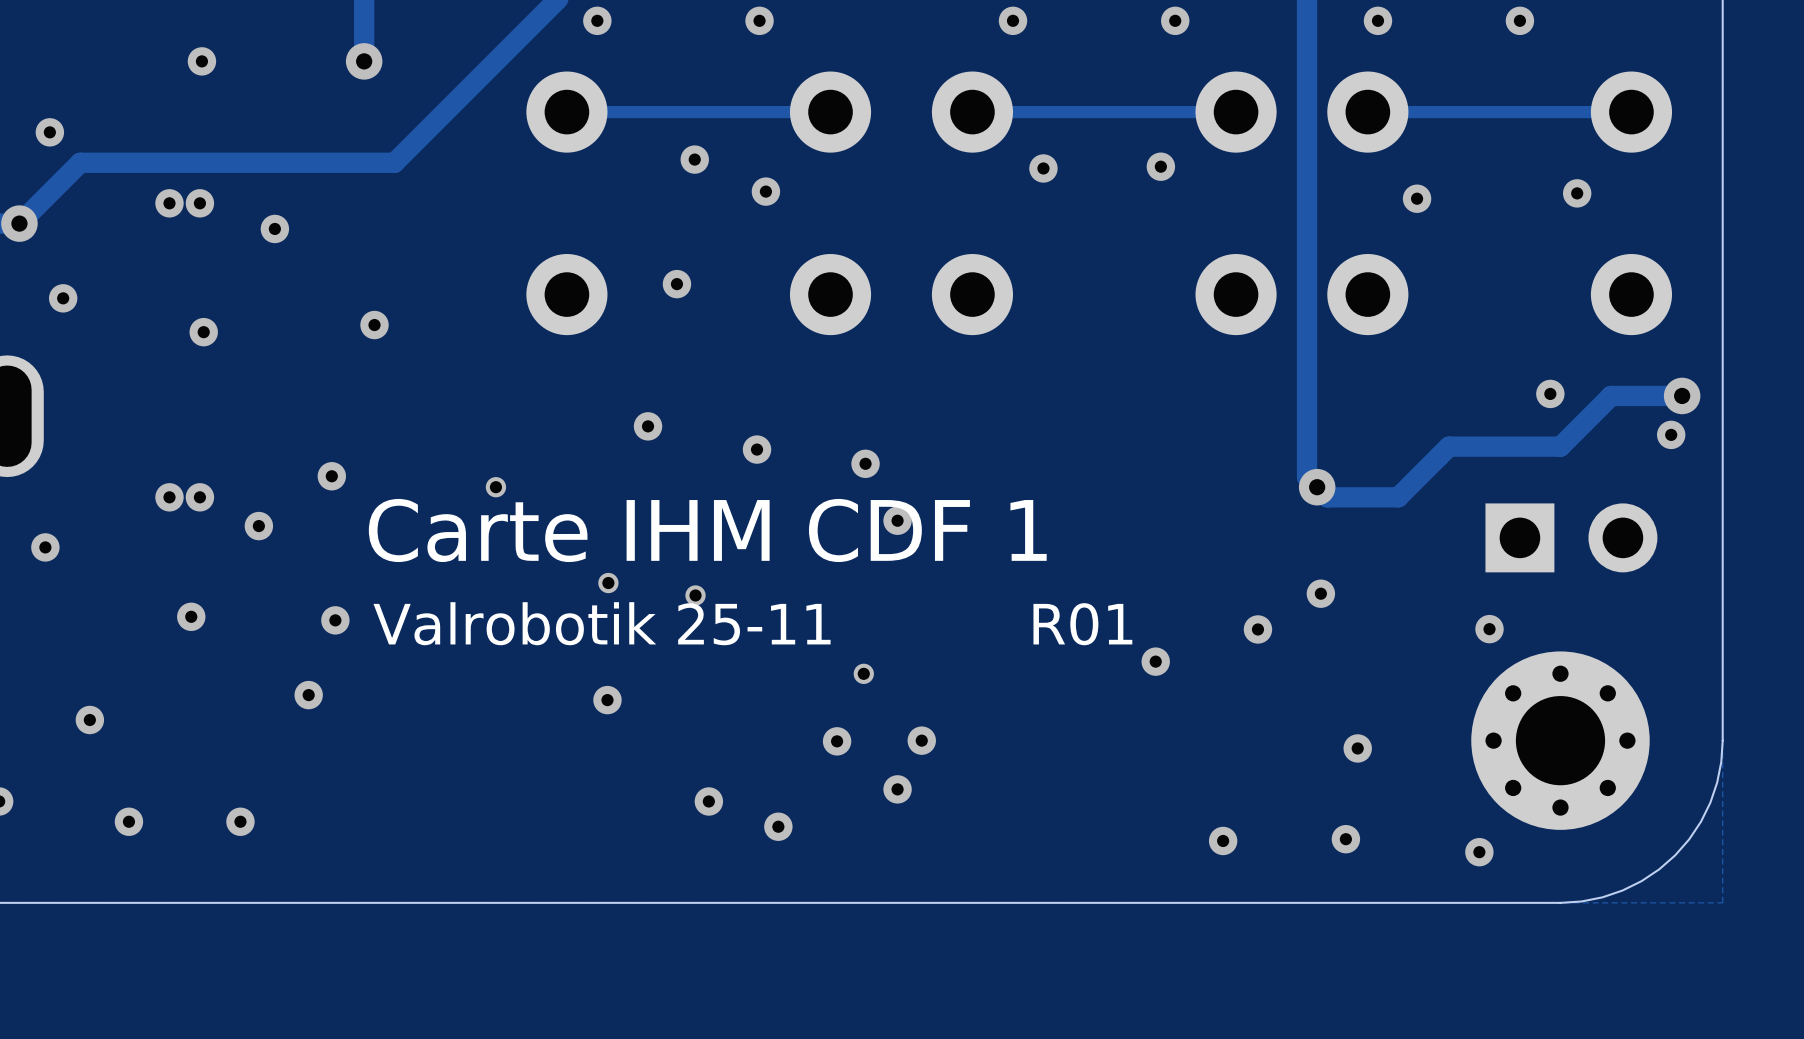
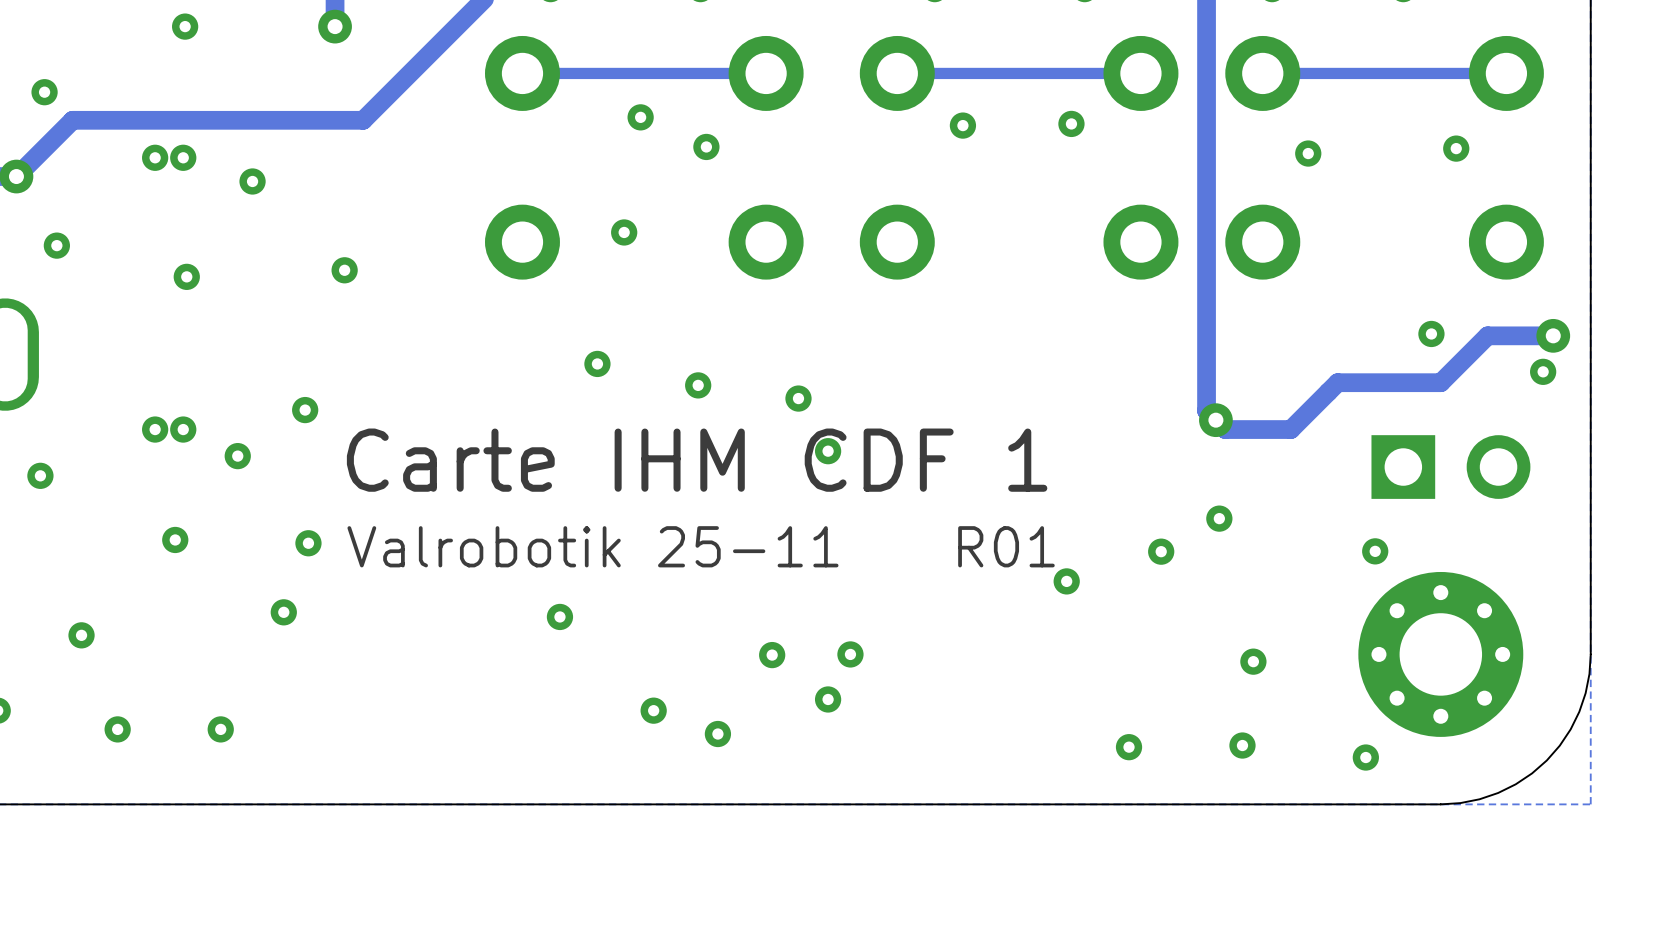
via: (495, 487) -> none
via: (608, 583) -> none
via: (695, 595) -> none
via: (863, 673) -> none

